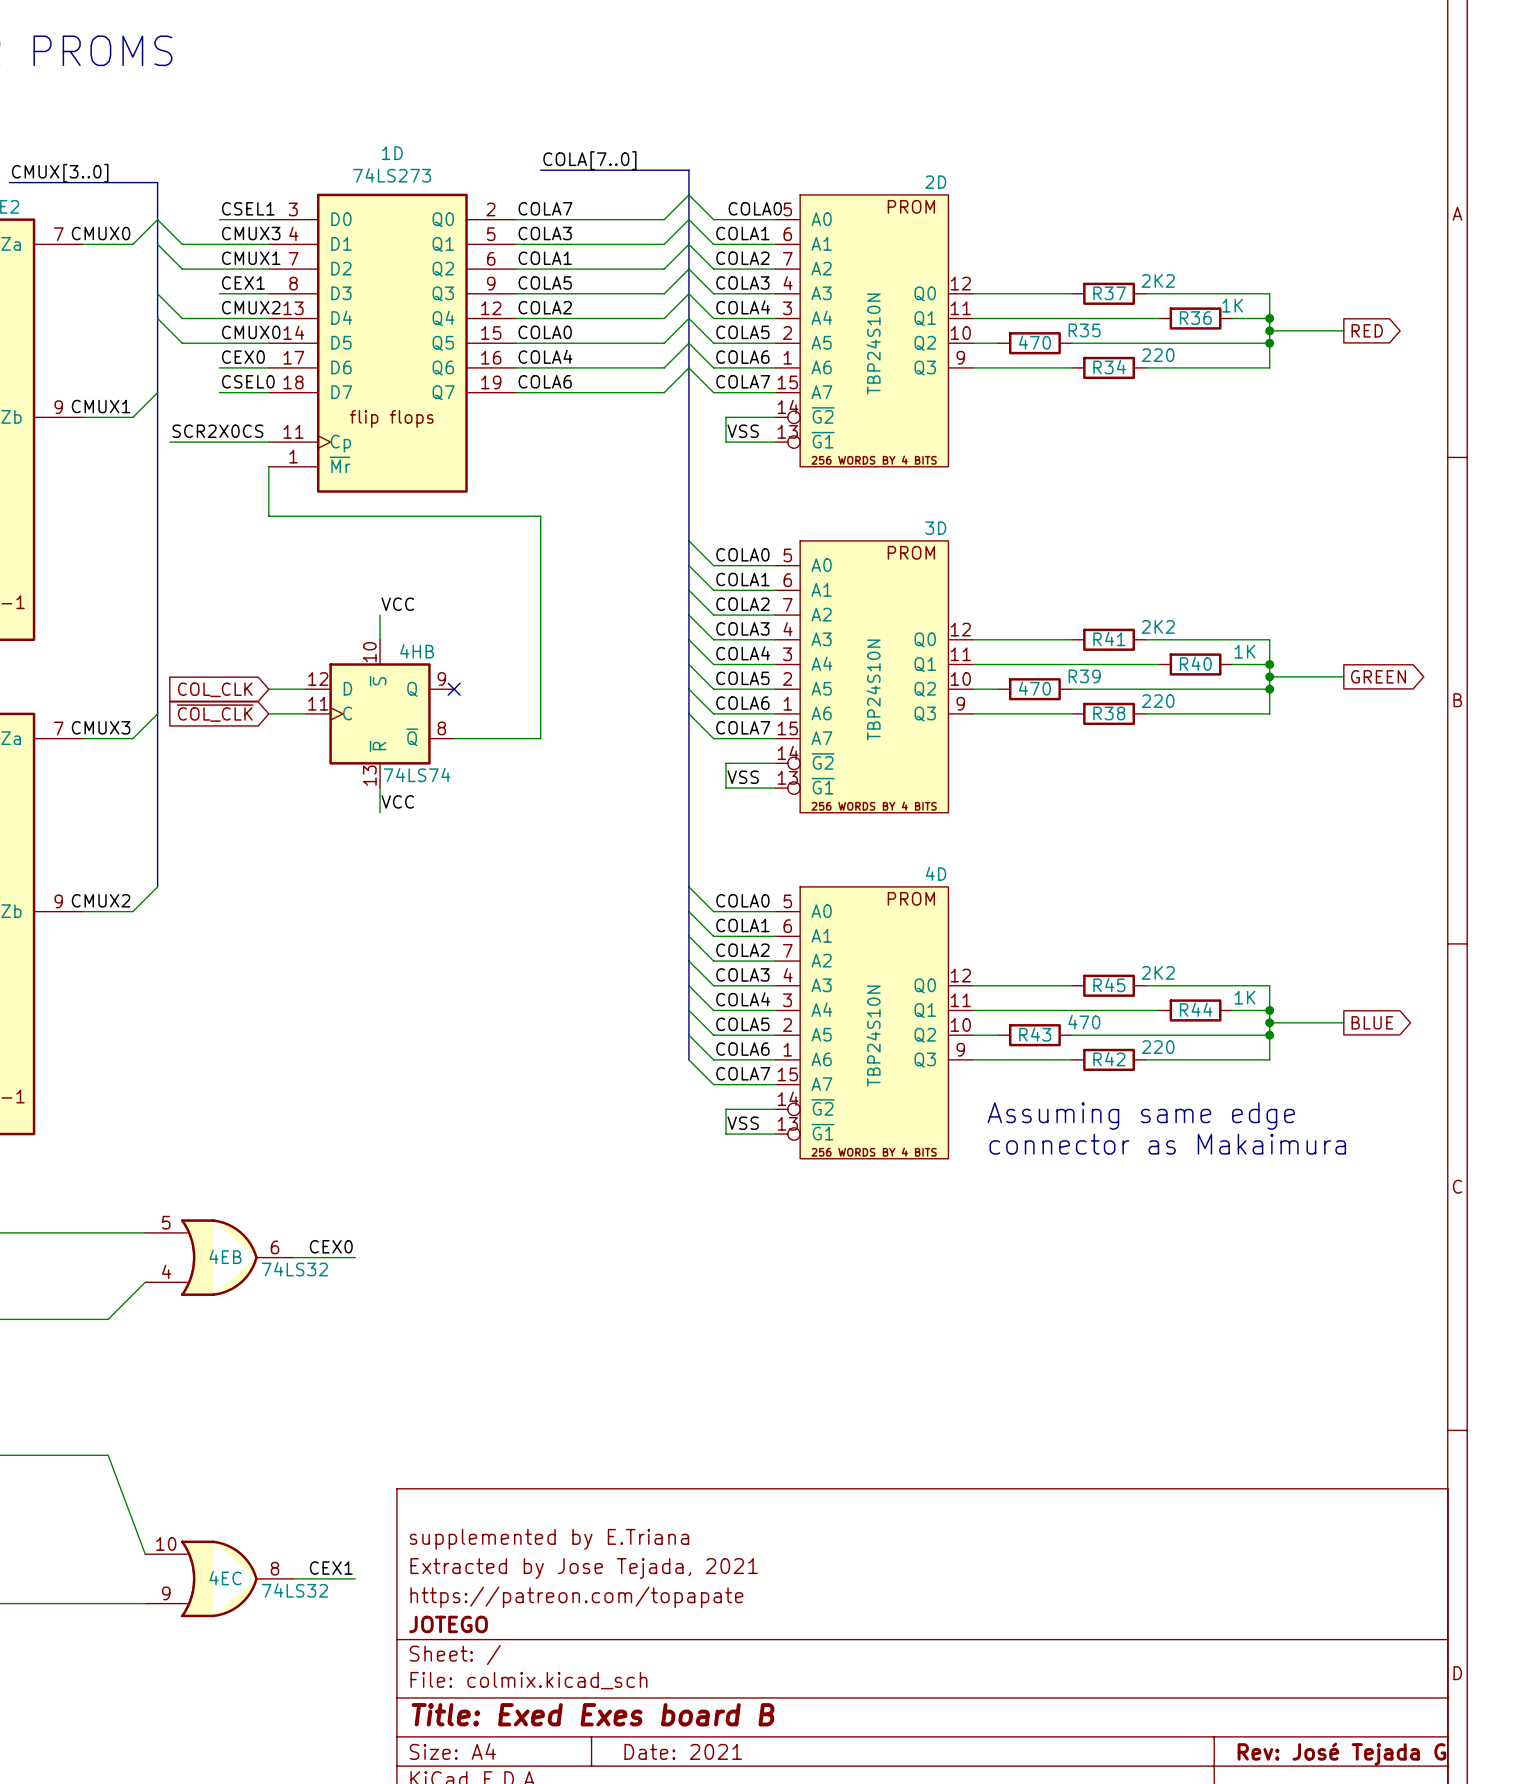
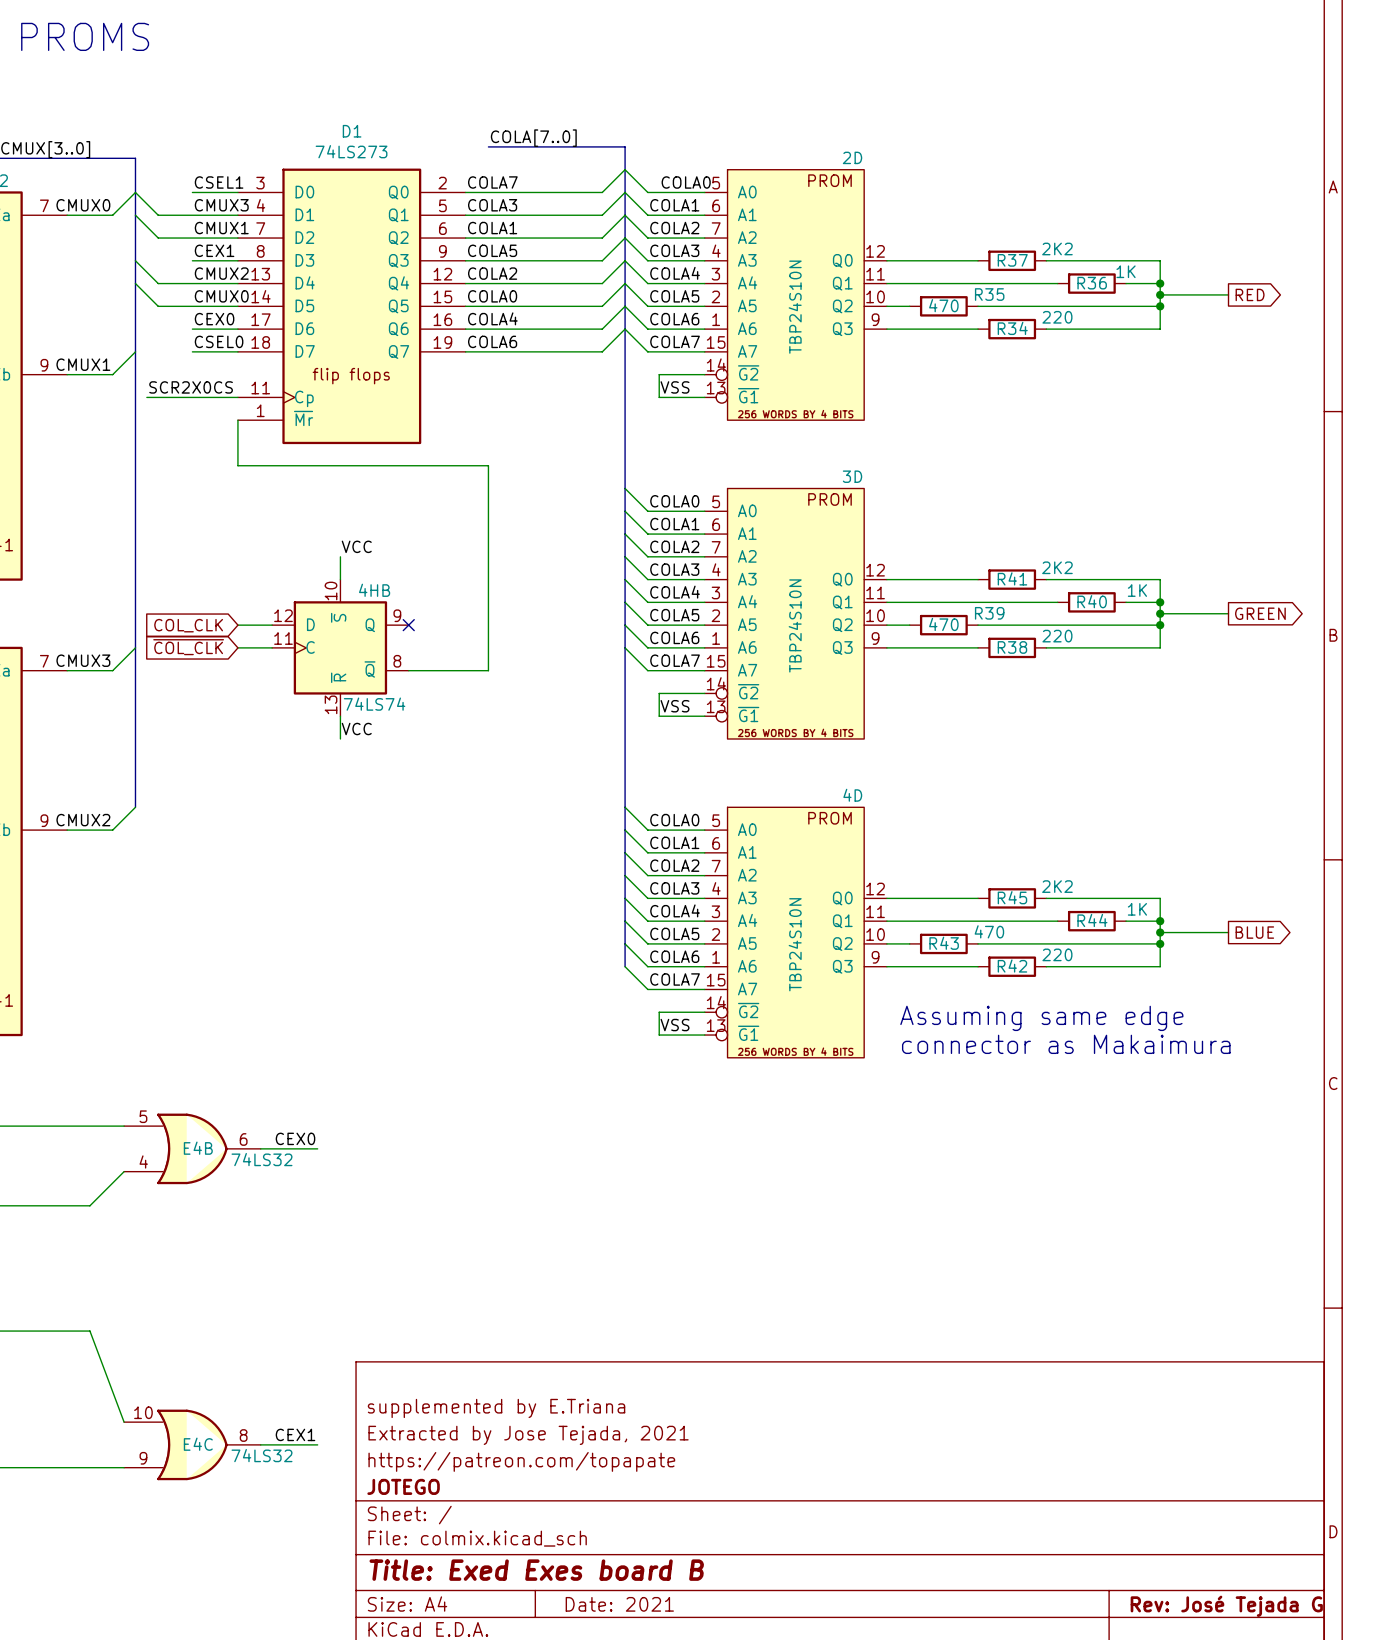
1D name: 1D (392, 153) -> D1 (352, 131)
4EB name: 4EB (225, 1256) -> E4B (198, 1148)
4EC name: 4EC (225, 1578) -> E4C (198, 1444)

